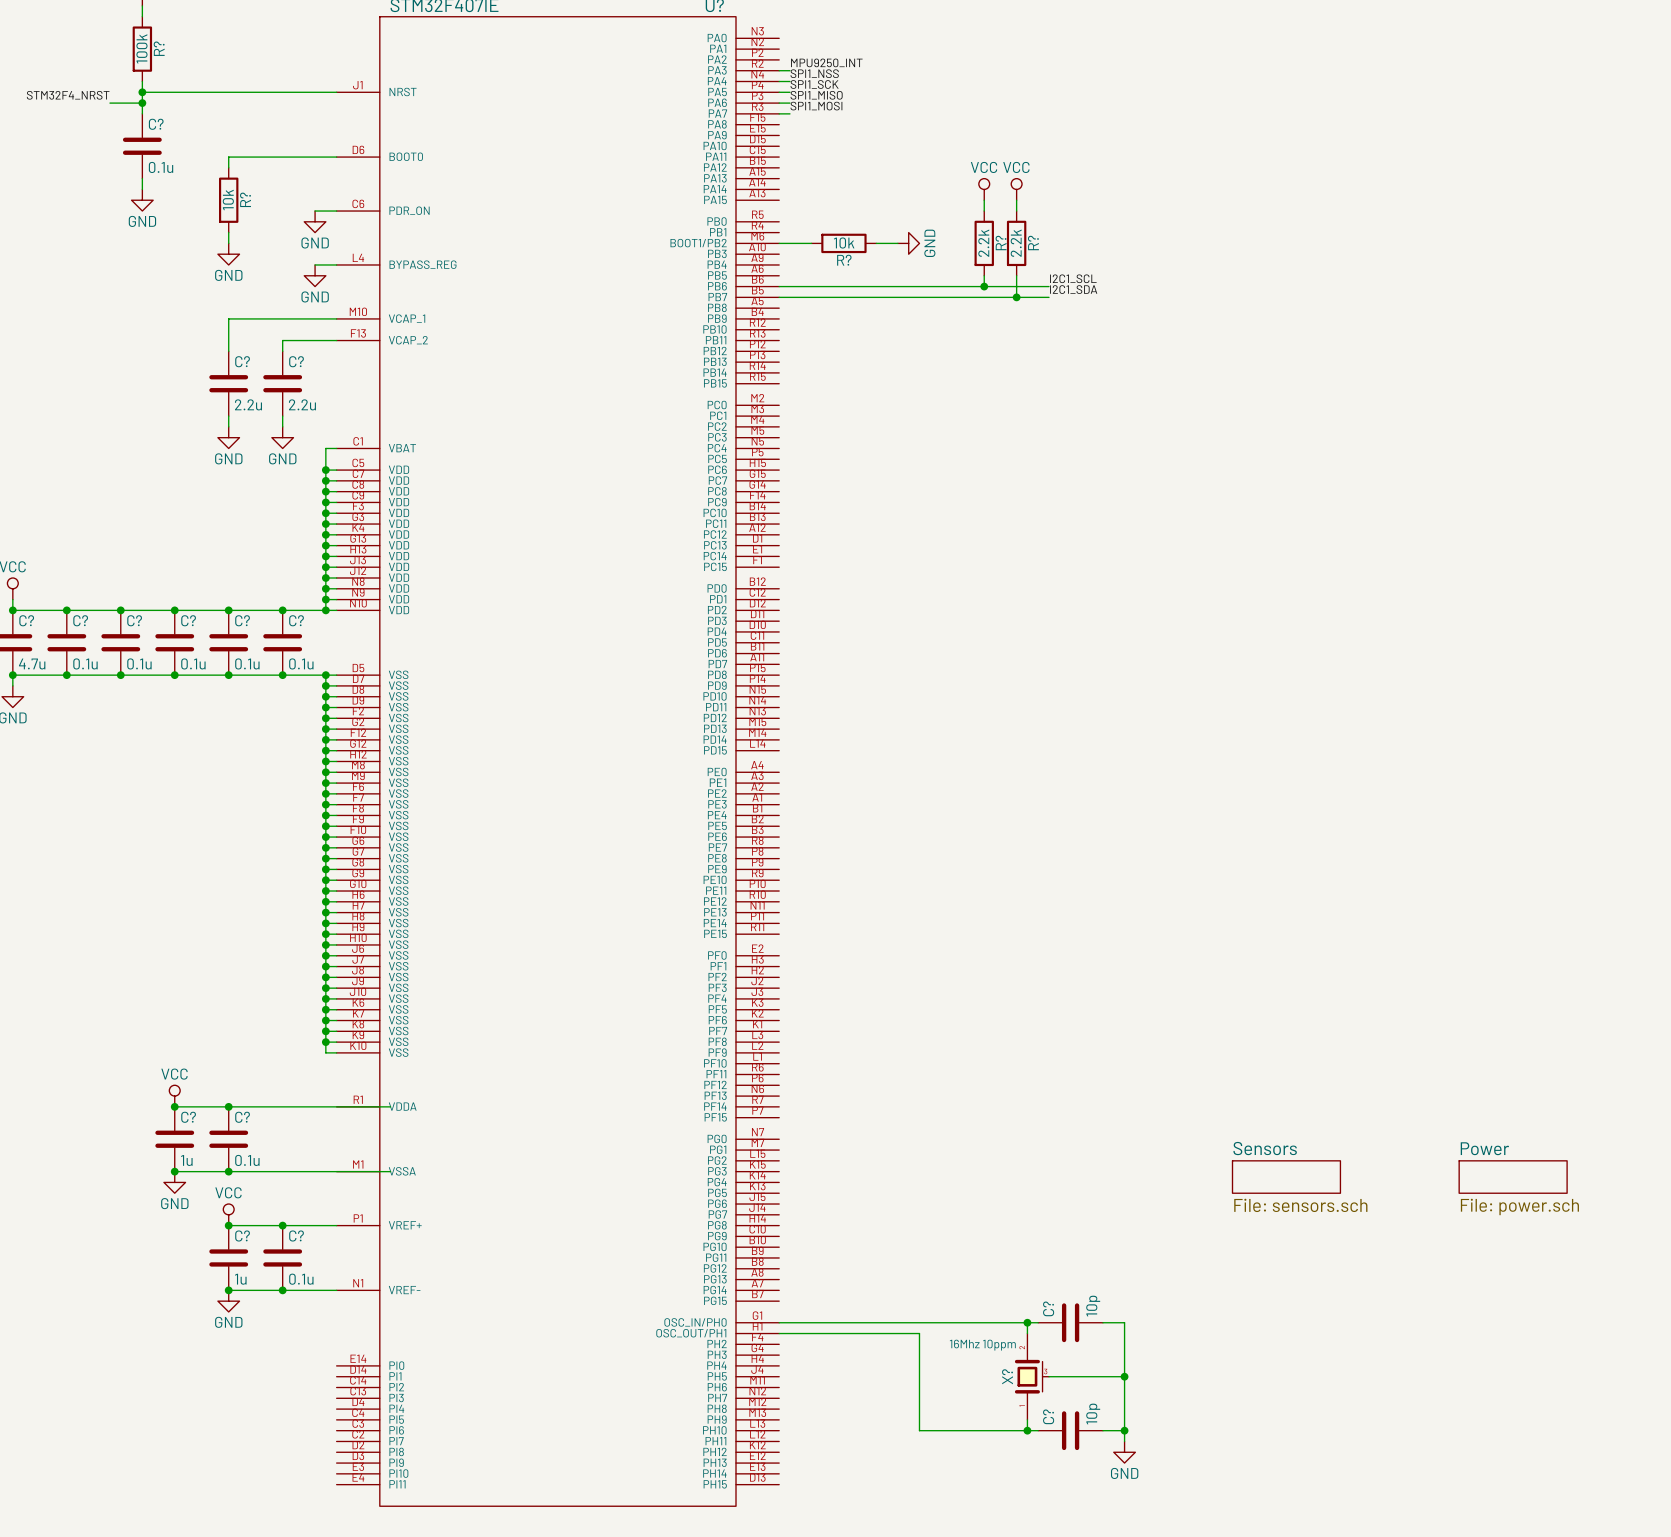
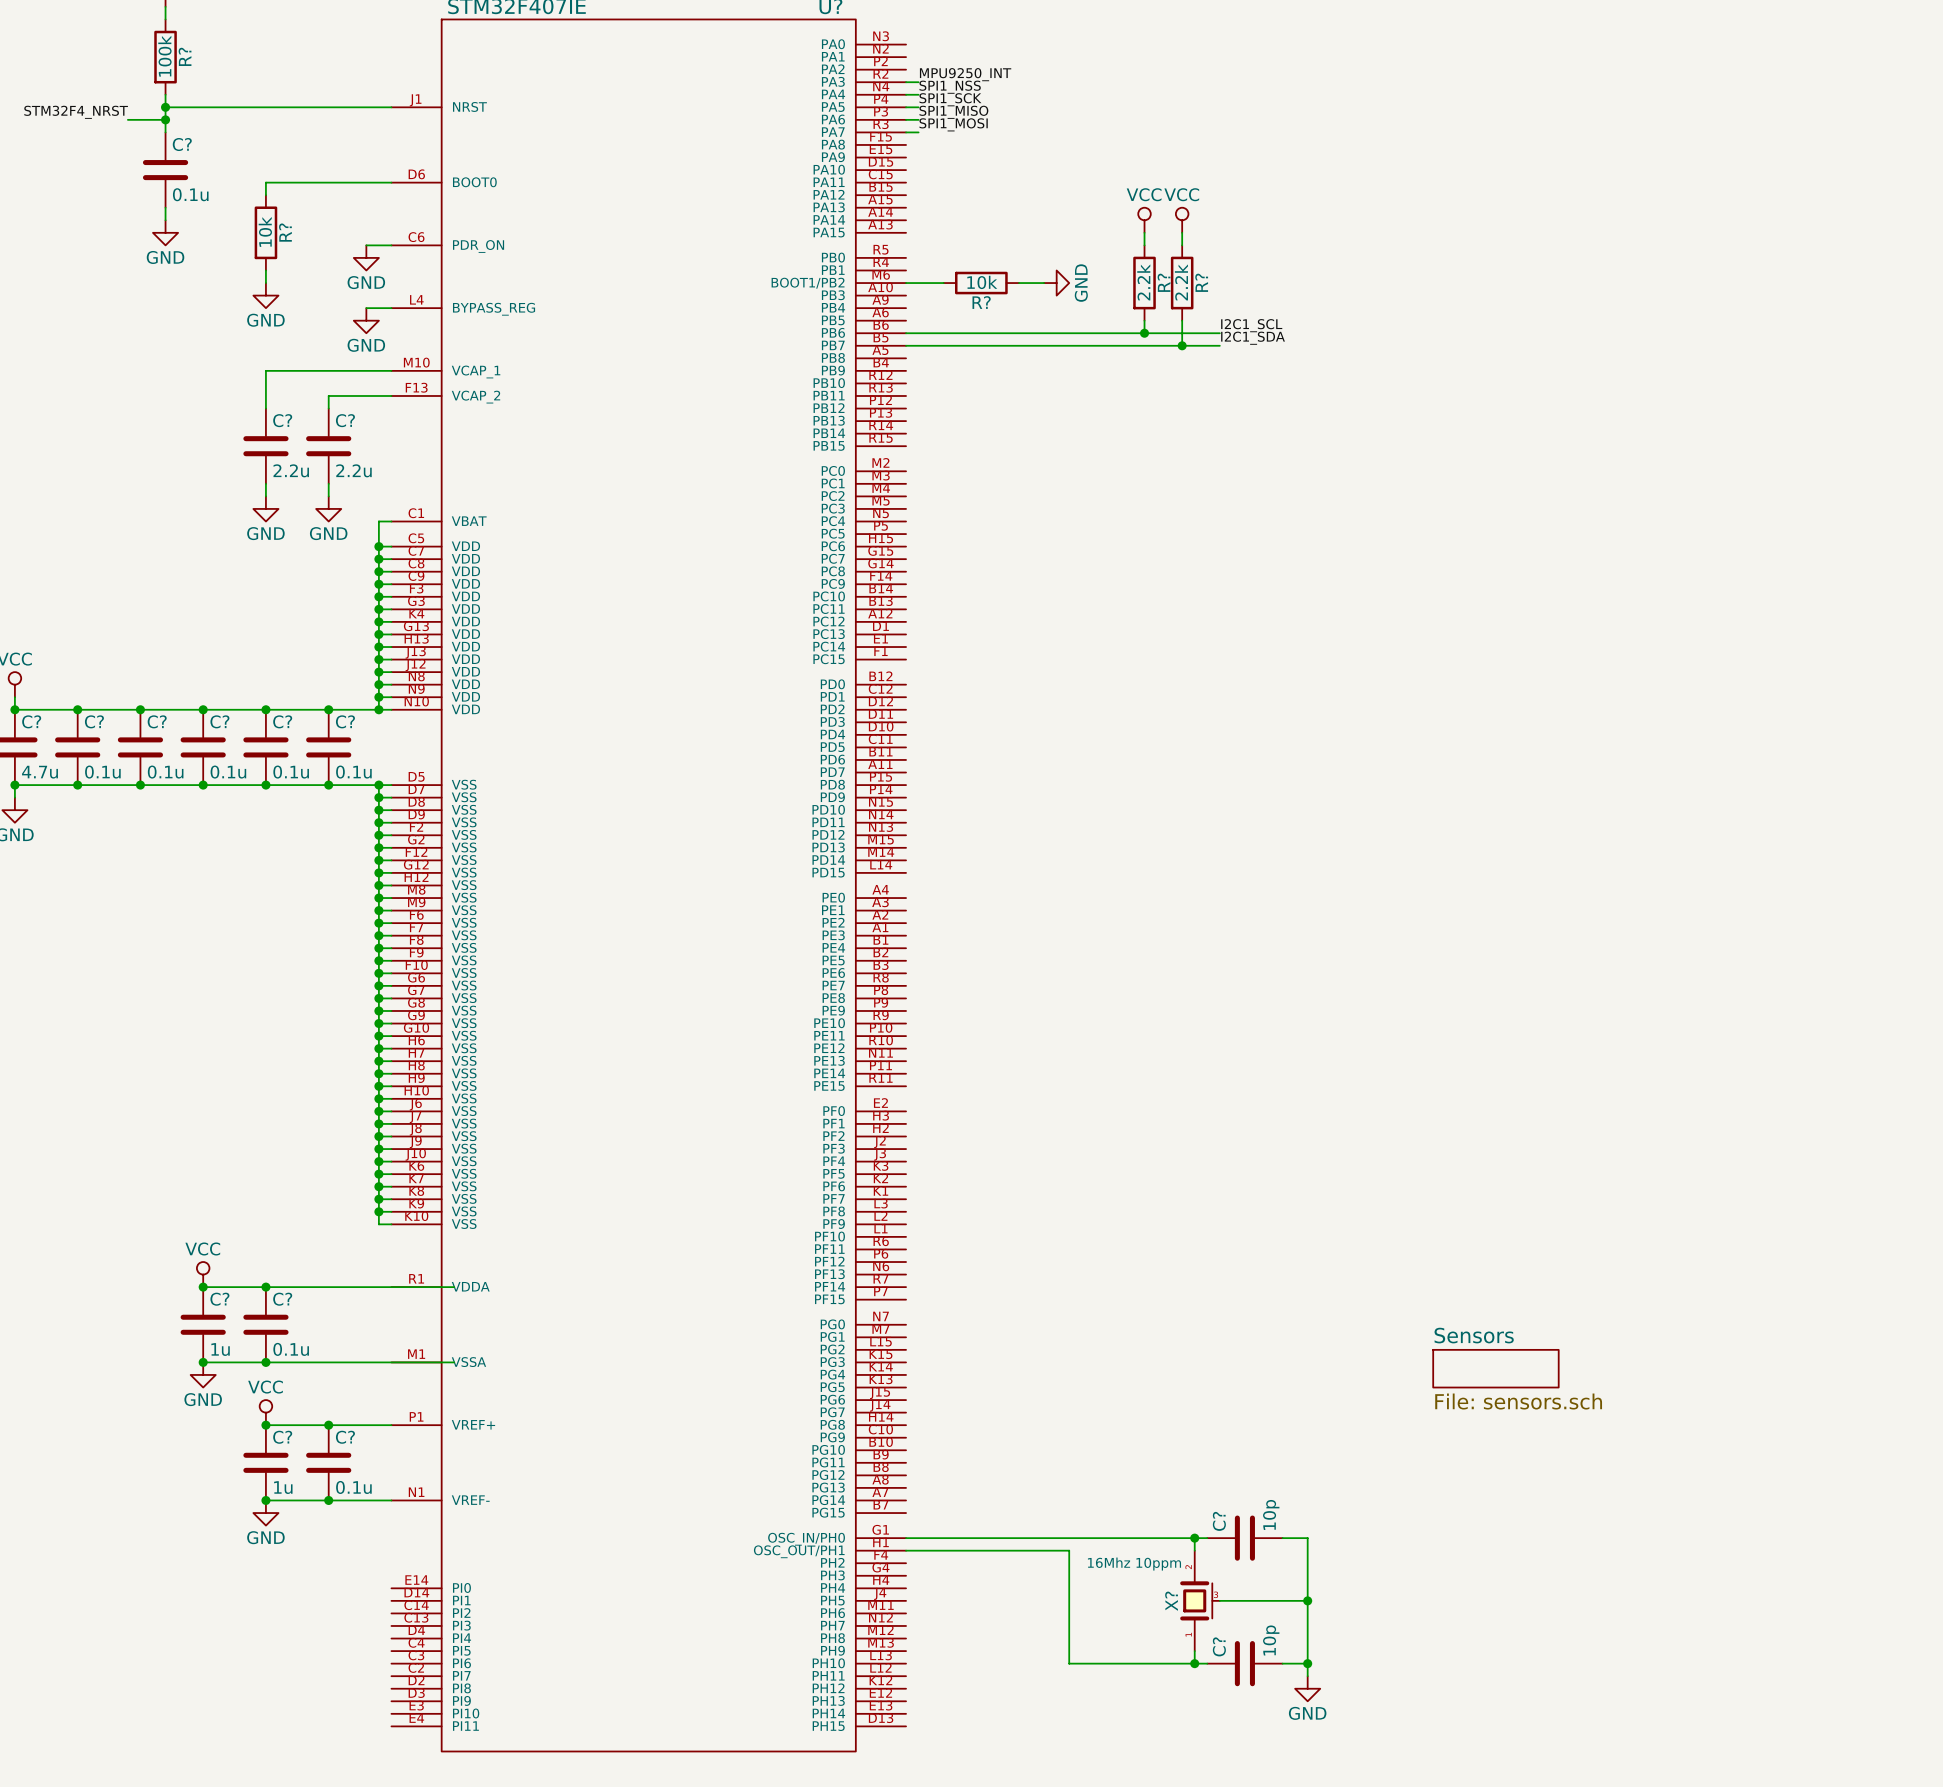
sheet Power: File: power.sch (1513, 1177) -> none

